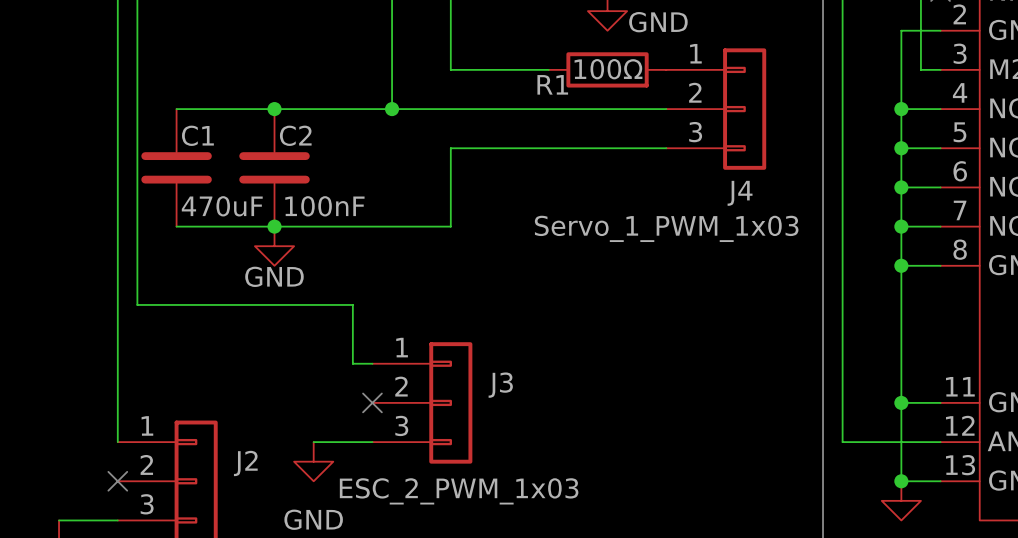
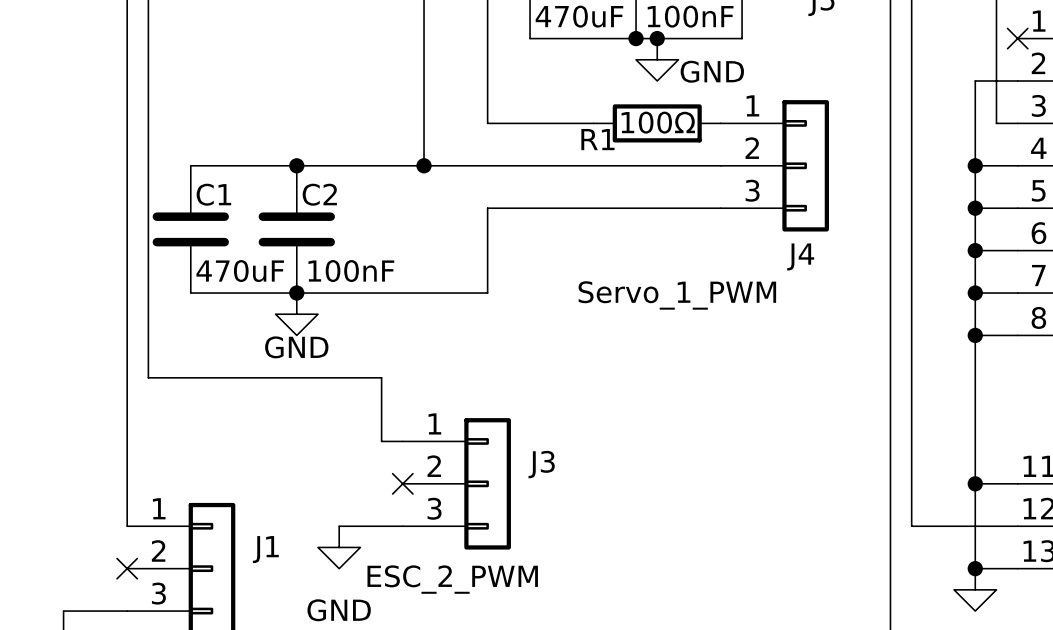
J4 value: Servo_1_PWM_1x03 (666, 228) -> Servo_1_PWM (677, 295)
J2 name: J2 (245, 463) -> J1 (265, 549)
J3 value: ESC_2_PWM_1x03 (459, 491) -> ESC_2_PWM (452, 579)

